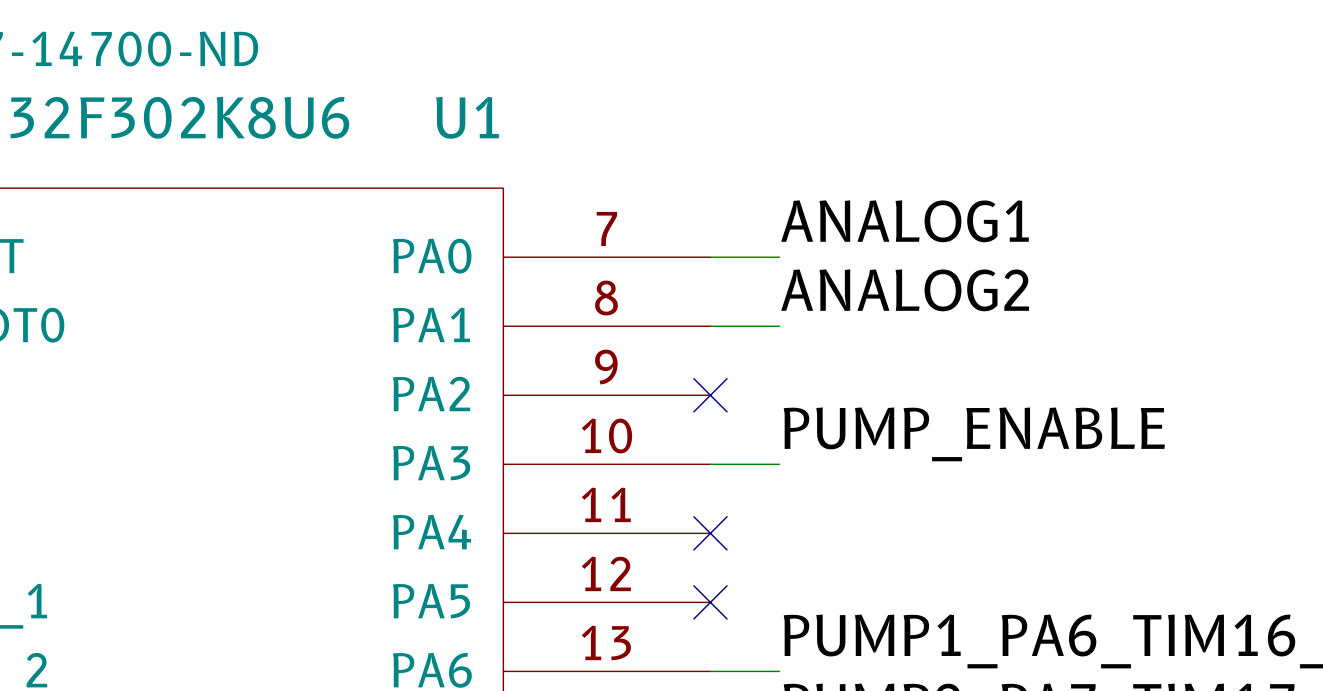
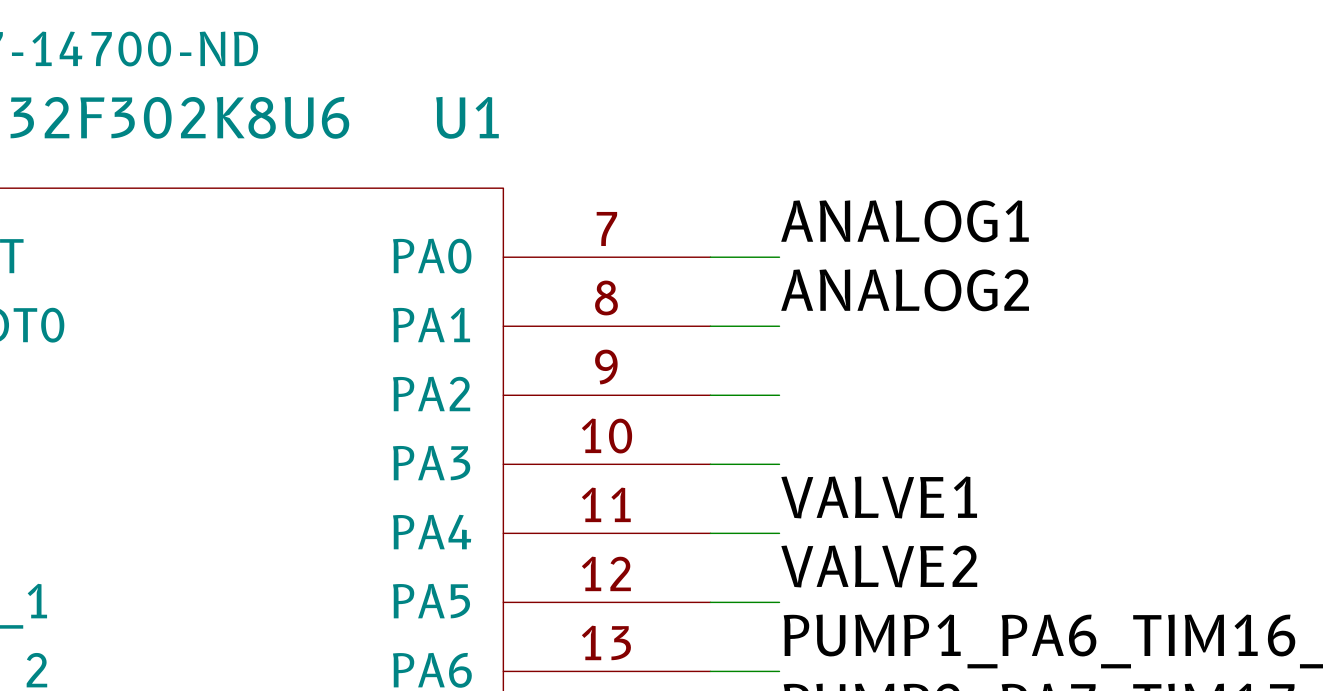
wire: none -> (710, 395) (779, 395)
no-connect mark: (710, 395) -> none
label: PUMP_ENABLE (974, 434) -> none
label: none -> VALVE1 (879, 497)
wire: none -> (710, 533) (779, 533)
no-connect mark: (710, 533) -> none
label: none -> VALVE2 (879, 566)
wire: none -> (710, 602) (779, 602)
no-connect mark: (710, 602) -> none

